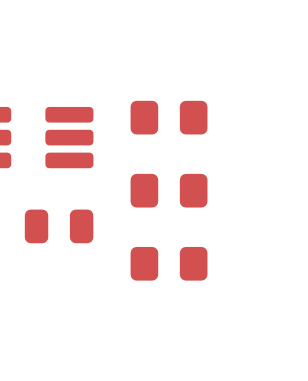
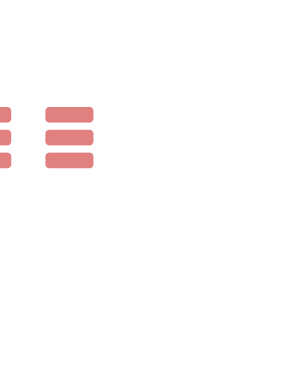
part: (169, 117) -> none
part: (169, 190) -> none
part: (59, 226) -> none
part: (169, 263) -> none

